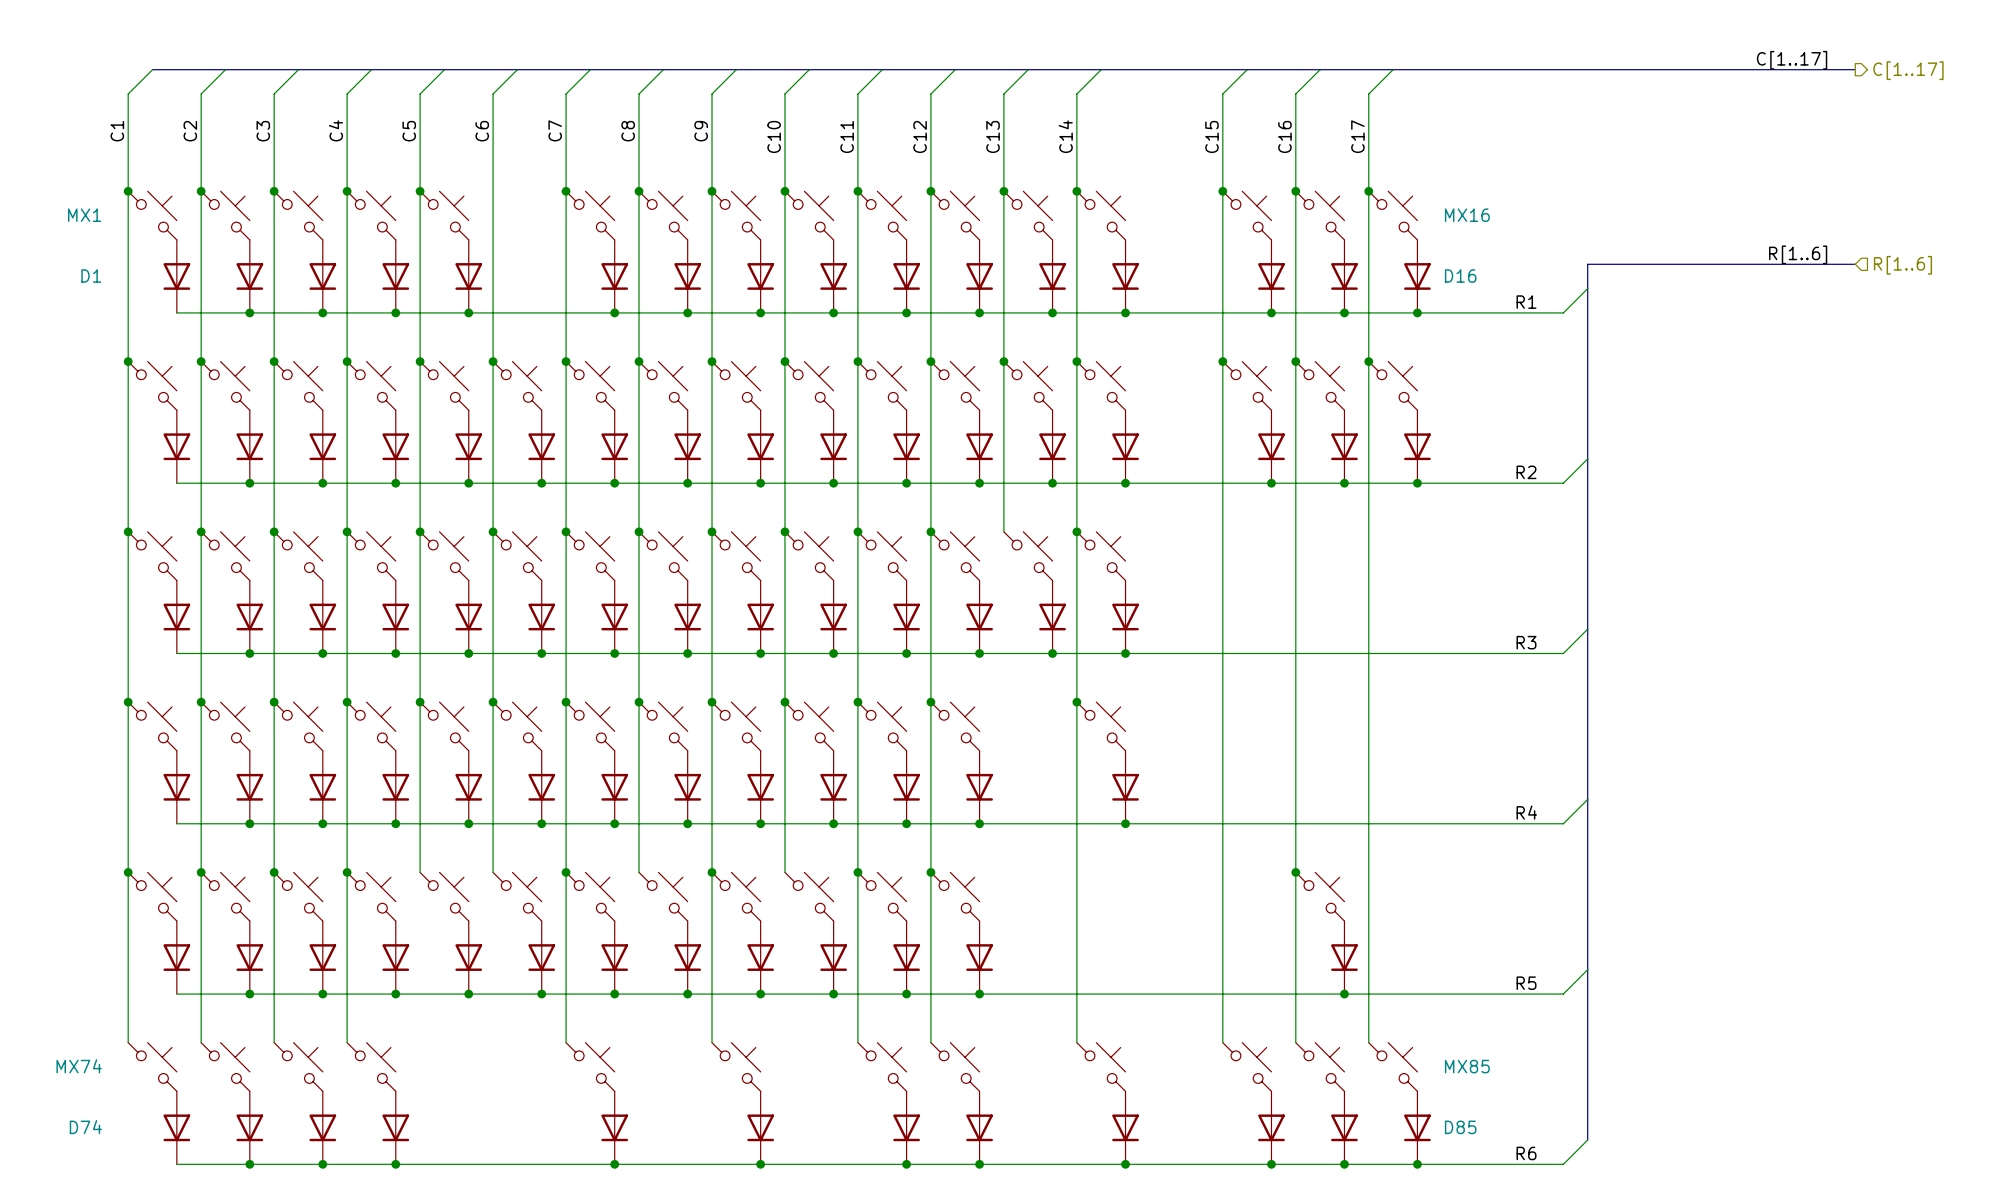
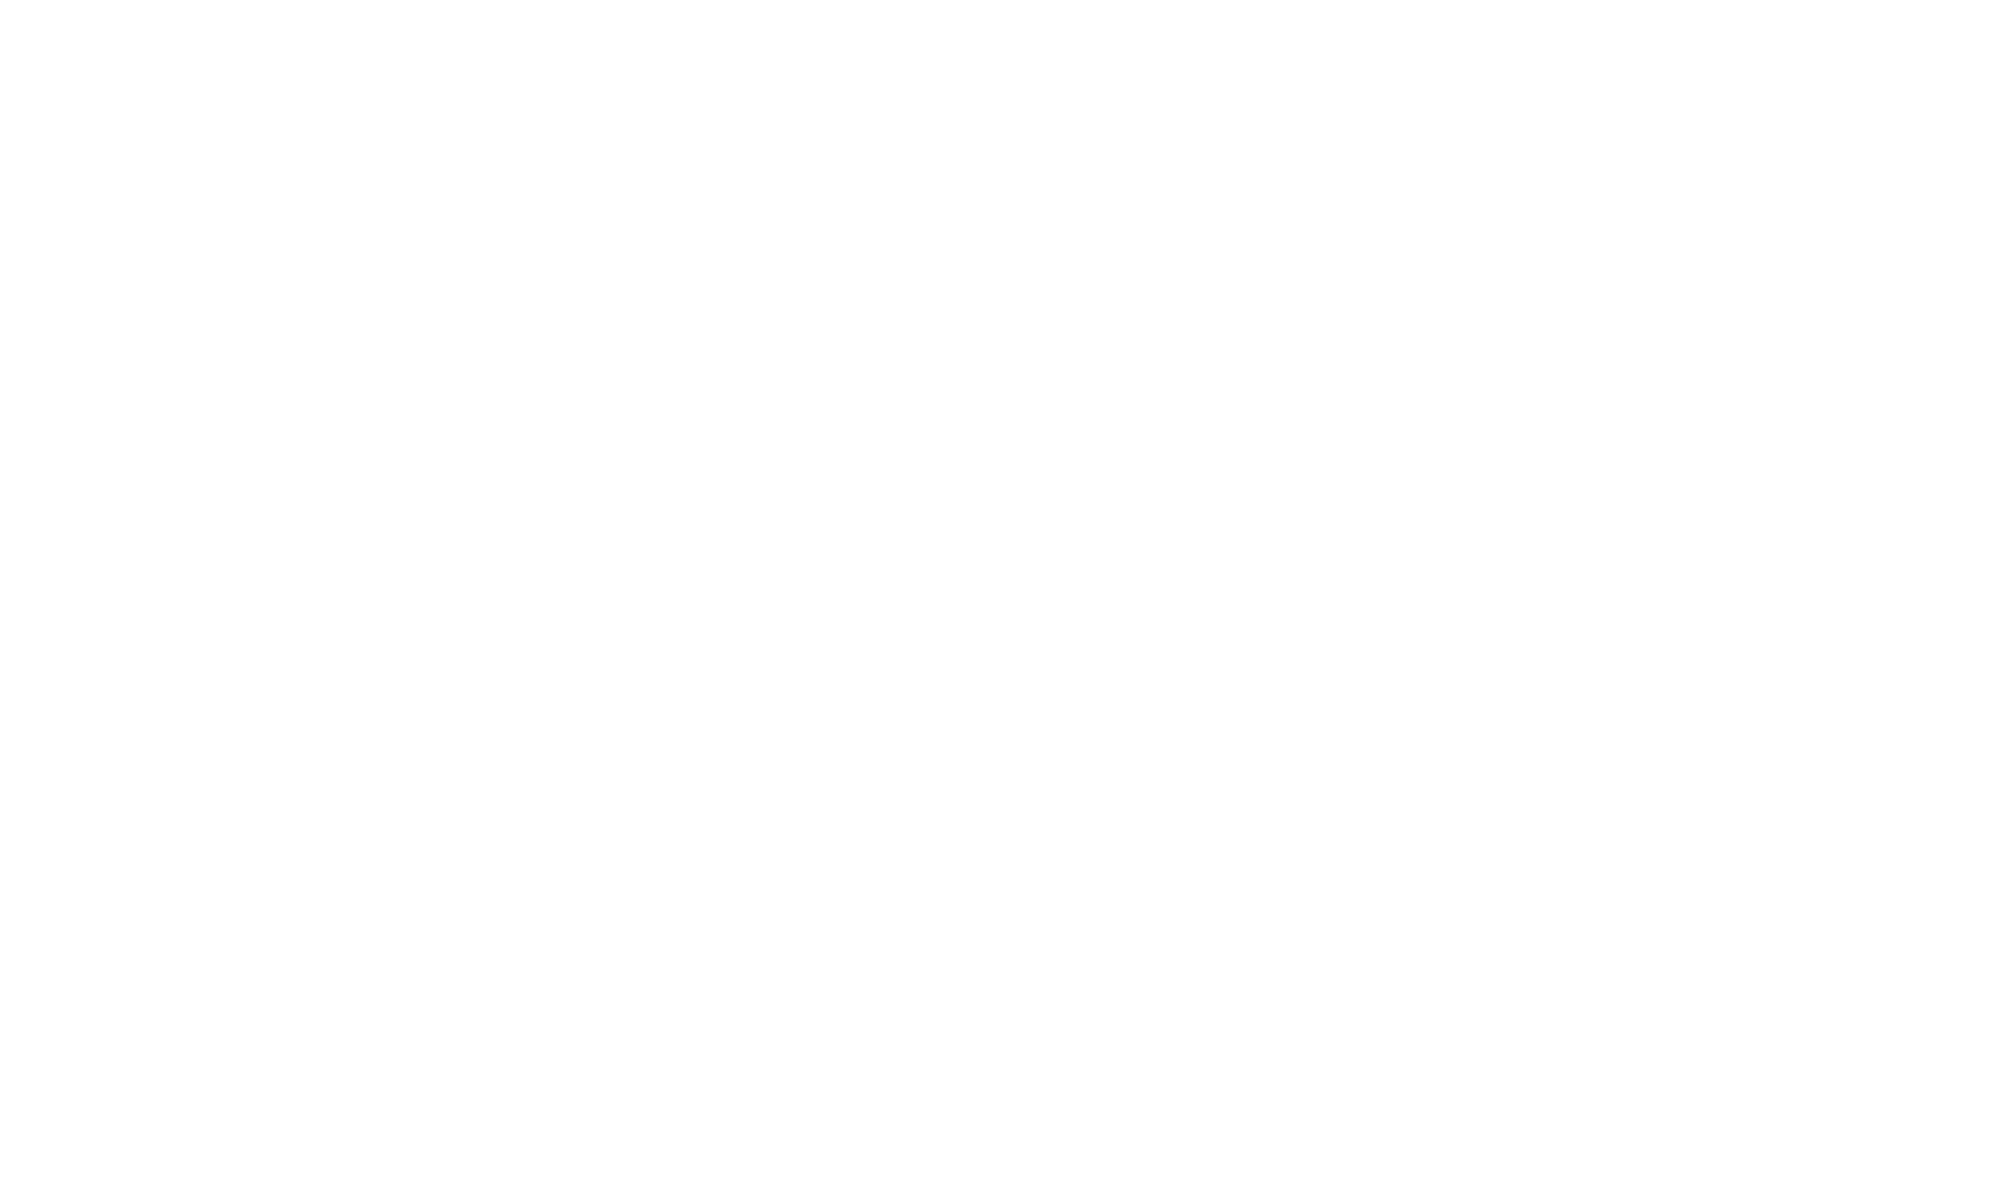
label: C[1..17] (1792, 60) -> none
wire: (152, 69) (128, 94) (128, 1042) -> none
bus: (152, 69) (1855, 69) -> none
wire: (225, 69) (201, 94) (201, 1042) -> none
wire: (298, 69) (274, 94) (274, 1042) -> none
wire: (371, 69) (347, 94) (347, 1042) -> none
wire: (444, 69) (420, 94) (420, 872) -> none
wire: (517, 69) (493, 94) (493, 872) -> none
wire: (590, 69) (566, 94) (566, 1042) -> none
wire: (663, 69) (639, 94) (639, 872) -> none
wire: (736, 69) (712, 94) (712, 1042) -> none
wire: (809, 69) (784, 94) (784, 872) -> none
wire: (882, 69) (857, 94) (857, 1042) -> none
wire: (955, 69) (930, 94) (930, 1042) -> none
wire: (1028, 69) (1003, 94) (1003, 531) -> none
wire: (1101, 69) (1076, 94) (1076, 1042) -> none
wire: (1247, 69) (1222, 94) (1222, 1042) -> none
wire: (1320, 69) (1295, 94) (1295, 1042) -> none
wire: (1393, 69) (1368, 94) (1368, 1042) -> none
hierarchical label: C[1..17] (1908, 70) -> none
label: C4 (335, 130) -> none
label: C7 (555, 130) -> none
label: C1 (117, 131) -> none
label: C2 (190, 131) -> none
label: C3 (263, 131) -> none
label: C5 (409, 131) -> none
label: C6 (482, 131) -> none
label: C8 (628, 131) -> none
label: C9 (701, 131) -> none
label: C10 (774, 136) -> none
label: C11 (847, 136) -> none
label: C12 (920, 136) -> none
label: C13 (993, 136) -> none
label: C14 (1065, 136) -> none
label: C15 (1211, 136) -> none
label: C16 (1284, 136) -> none
label: C17 (1357, 136) -> none
junction: (128, 191) -> none
junction: (201, 191) -> none
junction: (274, 191) -> none
junction: (347, 191) -> none
junction: (420, 191) -> none
junction: (566, 191) -> none
junction: (639, 191) -> none
junction: (712, 191) -> none
junction: (784, 191) -> none
junction: (857, 191) -> none
junction: (930, 191) -> none
junction: (1003, 191) -> none
junction: (1076, 191) -> none
junction: (1222, 191) -> none
junction: (1295, 191) -> none
junction: (1368, 191) -> none
MX1: (152, 215) -> none
part: (225, 215) -> none
part: (298, 215) -> none
part: (371, 215) -> none
part: (444, 215) -> none
part: (590, 215) -> none
part: (663, 215) -> none
part: (736, 215) -> none
part: (809, 215) -> none
part: (882, 215) -> none
part: (955, 215) -> none
part: (1028, 215) -> none
part: (1101, 215) -> none
part: (1247, 215) -> none
part: (1320, 215) -> none
MX16: (1393, 215) -> none
label: R[1..6] (1798, 254) -> none
bus: (1855, 264) (1587, 264) (1587, 1140) -> none
hierarchical label: R[1..6] (1902, 265) -> none
D1: (176, 276) -> none
part: (249, 276) -> none
part: (322, 276) -> none
part: (395, 276) -> none
part: (468, 276) -> none
part: (614, 276) -> none
part: (687, 276) -> none
part: (760, 276) -> none
part: (833, 276) -> none
part: (906, 276) -> none
part: (979, 276) -> none
part: (1052, 276) -> none
part: (1125, 276) -> none
part: (1271, 276) -> none
part: (1344, 276) -> none
D16: (1417, 276) -> none
wire: (1587, 288) (1563, 312) (176, 312) -> none
label: R1 (1526, 302) -> none
junction: (249, 312) -> none
junction: (322, 312) -> none
junction: (395, 312) -> none
junction: (468, 312) -> none
junction: (614, 312) -> none
junction: (687, 312) -> none
junction: (760, 312) -> none
junction: (833, 312) -> none
junction: (906, 312) -> none
junction: (979, 312) -> none
junction: (1052, 312) -> none
junction: (1125, 312) -> none
junction: (1271, 312) -> none
junction: (1344, 312) -> none
junction: (1417, 312) -> none
junction: (128, 361) -> none
junction: (201, 361) -> none
junction: (274, 361) -> none
junction: (347, 361) -> none
junction: (420, 361) -> none
junction: (493, 361) -> none
junction: (566, 361) -> none
junction: (639, 361) -> none
junction: (712, 361) -> none
junction: (784, 361) -> none
junction: (857, 361) -> none
junction: (930, 361) -> none
junction: (1003, 361) -> none
junction: (1076, 361) -> none
junction: (1222, 361) -> none
junction: (1295, 361) -> none
junction: (1368, 361) -> none
part: (152, 385) -> none
part: (225, 385) -> none
part: (298, 385) -> none
part: (371, 385) -> none
part: (444, 385) -> none
part: (517, 385) -> none
part: (590, 385) -> none
part: (663, 385) -> none
part: (736, 385) -> none
part: (809, 385) -> none
part: (882, 385) -> none
part: (955, 385) -> none
part: (1028, 385) -> none
part: (1101, 385) -> none
part: (1247, 385) -> none
part: (1320, 385) -> none
part: (1393, 385) -> none
part: (176, 446) -> none
part: (249, 446) -> none
part: (322, 446) -> none
part: (395, 446) -> none
part: (468, 446) -> none
part: (541, 446) -> none
part: (614, 446) -> none
part: (687, 446) -> none
part: (760, 446) -> none
part: (833, 446) -> none
part: (906, 446) -> none
part: (979, 446) -> none
part: (1052, 446) -> none
part: (1125, 446) -> none
part: (1271, 446) -> none
part: (1344, 446) -> none
part: (1417, 446) -> none
wire: (1587, 458) (1563, 483) (176, 483) -> none
label: R2 (1526, 472) -> none
junction: (249, 483) -> none
junction: (322, 483) -> none
junction: (395, 483) -> none
junction: (468, 483) -> none
junction: (541, 483) -> none
junction: (614, 483) -> none
junction: (687, 483) -> none
junction: (760, 483) -> none
junction: (833, 483) -> none
junction: (906, 483) -> none
junction: (979, 483) -> none
junction: (1052, 483) -> none
junction: (1125, 483) -> none
junction: (1271, 483) -> none
junction: (1344, 483) -> none
junction: (1417, 483) -> none
junction: (128, 531) -> none
junction: (201, 531) -> none
junction: (274, 531) -> none
junction: (347, 531) -> none
junction: (420, 531) -> none
junction: (493, 531) -> none
junction: (566, 531) -> none
junction: (639, 531) -> none
junction: (712, 531) -> none
junction: (784, 531) -> none
junction: (857, 531) -> none
junction: (930, 531) -> none
junction: (1076, 531) -> none
part: (152, 556) -> none
part: (225, 556) -> none
part: (298, 556) -> none
part: (371, 556) -> none
part: (444, 556) -> none
part: (517, 556) -> none
part: (590, 556) -> none
part: (663, 556) -> none
part: (736, 556) -> none
part: (809, 556) -> none
part: (882, 556) -> none
part: (955, 556) -> none
part: (1028, 556) -> none
part: (1101, 556) -> none
part: (176, 617) -> none
part: (249, 617) -> none
part: (322, 617) -> none
part: (395, 617) -> none
part: (468, 617) -> none
part: (541, 617) -> none
part: (614, 617) -> none
part: (687, 617) -> none
part: (760, 617) -> none
part: (833, 617) -> none
part: (906, 617) -> none
part: (979, 617) -> none
part: (1052, 617) -> none
part: (1125, 617) -> none
wire: (1587, 629) (1563, 653) (176, 653) -> none
label: R3 (1526, 642) -> none
junction: (249, 653) -> none
junction: (322, 653) -> none
junction: (395, 653) -> none
junction: (468, 653) -> none
junction: (541, 653) -> none
junction: (614, 653) -> none
junction: (687, 653) -> none
junction: (760, 653) -> none
junction: (833, 653) -> none
junction: (906, 653) -> none
junction: (979, 653) -> none
junction: (1052, 653) -> none
junction: (1125, 653) -> none
junction: (128, 702) -> none
junction: (201, 702) -> none
junction: (274, 702) -> none
junction: (347, 702) -> none
junction: (420, 702) -> none
junction: (493, 702) -> none
junction: (566, 702) -> none
junction: (639, 702) -> none
junction: (712, 702) -> none
junction: (784, 702) -> none
junction: (857, 702) -> none
junction: (930, 702) -> none
junction: (1076, 702) -> none
part: (152, 726) -> none
part: (225, 726) -> none
part: (298, 726) -> none
part: (371, 726) -> none
part: (444, 726) -> none
part: (517, 726) -> none
part: (590, 726) -> none
part: (663, 726) -> none
part: (736, 726) -> none
part: (809, 726) -> none
part: (882, 726) -> none
part: (955, 726) -> none
part: (1101, 726) -> none
part: (176, 787) -> none
part: (249, 787) -> none
part: (322, 787) -> none
part: (395, 787) -> none
part: (468, 787) -> none
part: (541, 787) -> none
part: (614, 787) -> none
part: (687, 787) -> none
part: (760, 787) -> none
part: (833, 787) -> none
part: (906, 787) -> none
part: (979, 787) -> none
part: (1125, 787) -> none
wire: (1587, 799) (1563, 823) (176, 823) -> none
label: R4 (1526, 812) -> none
junction: (249, 823) -> none
junction: (322, 823) -> none
junction: (395, 823) -> none
junction: (468, 823) -> none
junction: (541, 823) -> none
junction: (614, 823) -> none
junction: (687, 823) -> none
junction: (760, 823) -> none
junction: (833, 823) -> none
junction: (906, 823) -> none
junction: (979, 823) -> none
junction: (1125, 823) -> none
junction: (128, 872) -> none
junction: (201, 872) -> none
junction: (274, 872) -> none
junction: (347, 872) -> none
junction: (566, 872) -> none
junction: (712, 872) -> none
junction: (857, 872) -> none
junction: (930, 872) -> none
junction: (1295, 872) -> none
part: (152, 896) -> none
part: (225, 896) -> none
part: (298, 896) -> none
part: (371, 896) -> none
part: (444, 896) -> none
part: (517, 896) -> none
part: (590, 896) -> none
part: (663, 896) -> none
part: (736, 896) -> none
part: (809, 896) -> none
part: (882, 896) -> none
part: (955, 896) -> none
part: (1320, 896) -> none
part: (176, 957) -> none
part: (249, 957) -> none
part: (322, 957) -> none
part: (395, 957) -> none
part: (468, 957) -> none
part: (541, 957) -> none
part: (614, 957) -> none
part: (687, 957) -> none
part: (760, 957) -> none
part: (833, 957) -> none
part: (906, 957) -> none
part: (979, 957) -> none
part: (1344, 957) -> none
wire: (1587, 969) (1563, 994) (176, 994) -> none
label: R5 (1526, 983) -> none
junction: (249, 994) -> none
junction: (322, 994) -> none
junction: (395, 994) -> none
junction: (468, 994) -> none
junction: (541, 994) -> none
junction: (614, 994) -> none
junction: (687, 994) -> none
junction: (760, 994) -> none
junction: (833, 994) -> none
junction: (906, 994) -> none
junction: (979, 994) -> none
junction: (1344, 994) -> none
MX74: (152, 1067) -> none
part: (225, 1067) -> none
part: (298, 1067) -> none
part: (371, 1067) -> none
part: (590, 1067) -> none
part: (736, 1067) -> none
part: (882, 1067) -> none
part: (955, 1067) -> none
part: (1101, 1067) -> none
part: (1247, 1067) -> none
part: (1320, 1067) -> none
MX85: (1393, 1067) -> none
D74: (176, 1127) -> none
part: (249, 1127) -> none
part: (322, 1127) -> none
part: (395, 1127) -> none
part: (614, 1127) -> none
part: (760, 1127) -> none
part: (906, 1127) -> none
part: (979, 1127) -> none
part: (1125, 1127) -> none
part: (1271, 1127) -> none
part: (1344, 1127) -> none
D85: (1417, 1127) -> none
wire: (1587, 1140) (1563, 1164) (176, 1164) -> none
label: R6 (1526, 1153) -> none
junction: (249, 1164) -> none
junction: (322, 1164) -> none
junction: (395, 1164) -> none
junction: (614, 1164) -> none
junction: (760, 1164) -> none
junction: (906, 1164) -> none
junction: (979, 1164) -> none
junction: (1125, 1164) -> none
junction: (1271, 1164) -> none
junction: (1344, 1164) -> none
junction: (1417, 1164) -> none

